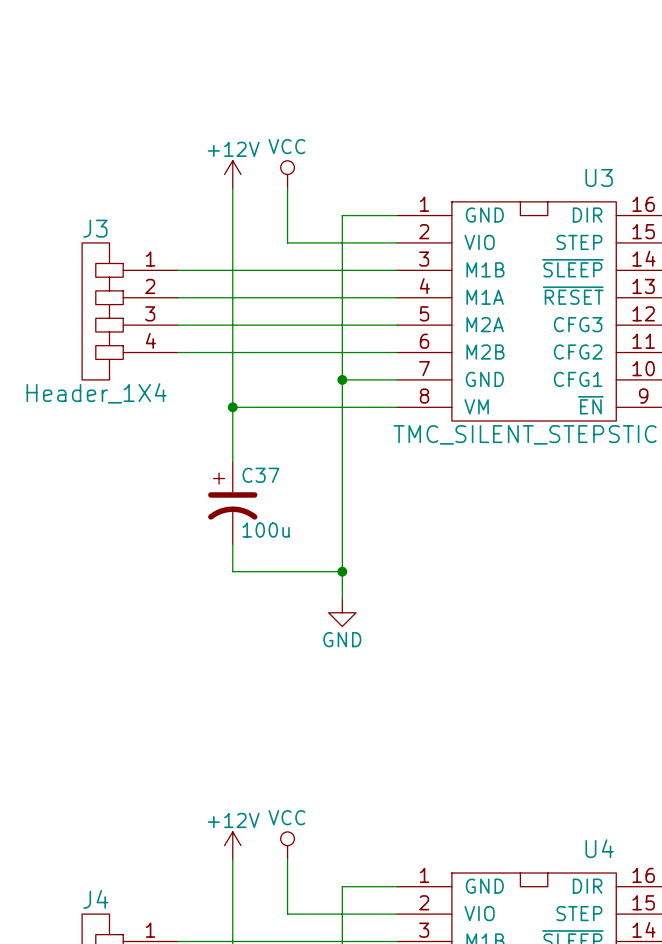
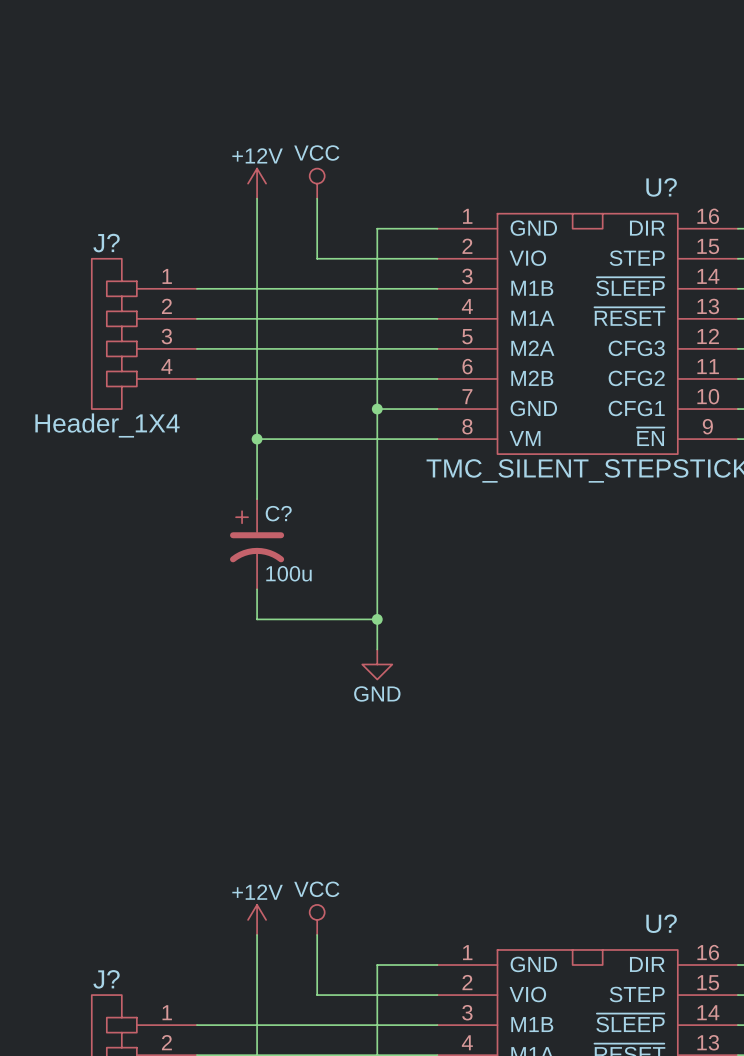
U3 name: U3 (599, 177) -> U? (661, 187)
J3 name: J3 (95, 228) -> J? (106, 243)
C37 name: C37 (260, 475) -> C? (278, 513)
U4 name: U4 (599, 848) -> U? (661, 923)
J4 name: J4 (95, 899) -> J? (106, 979)

